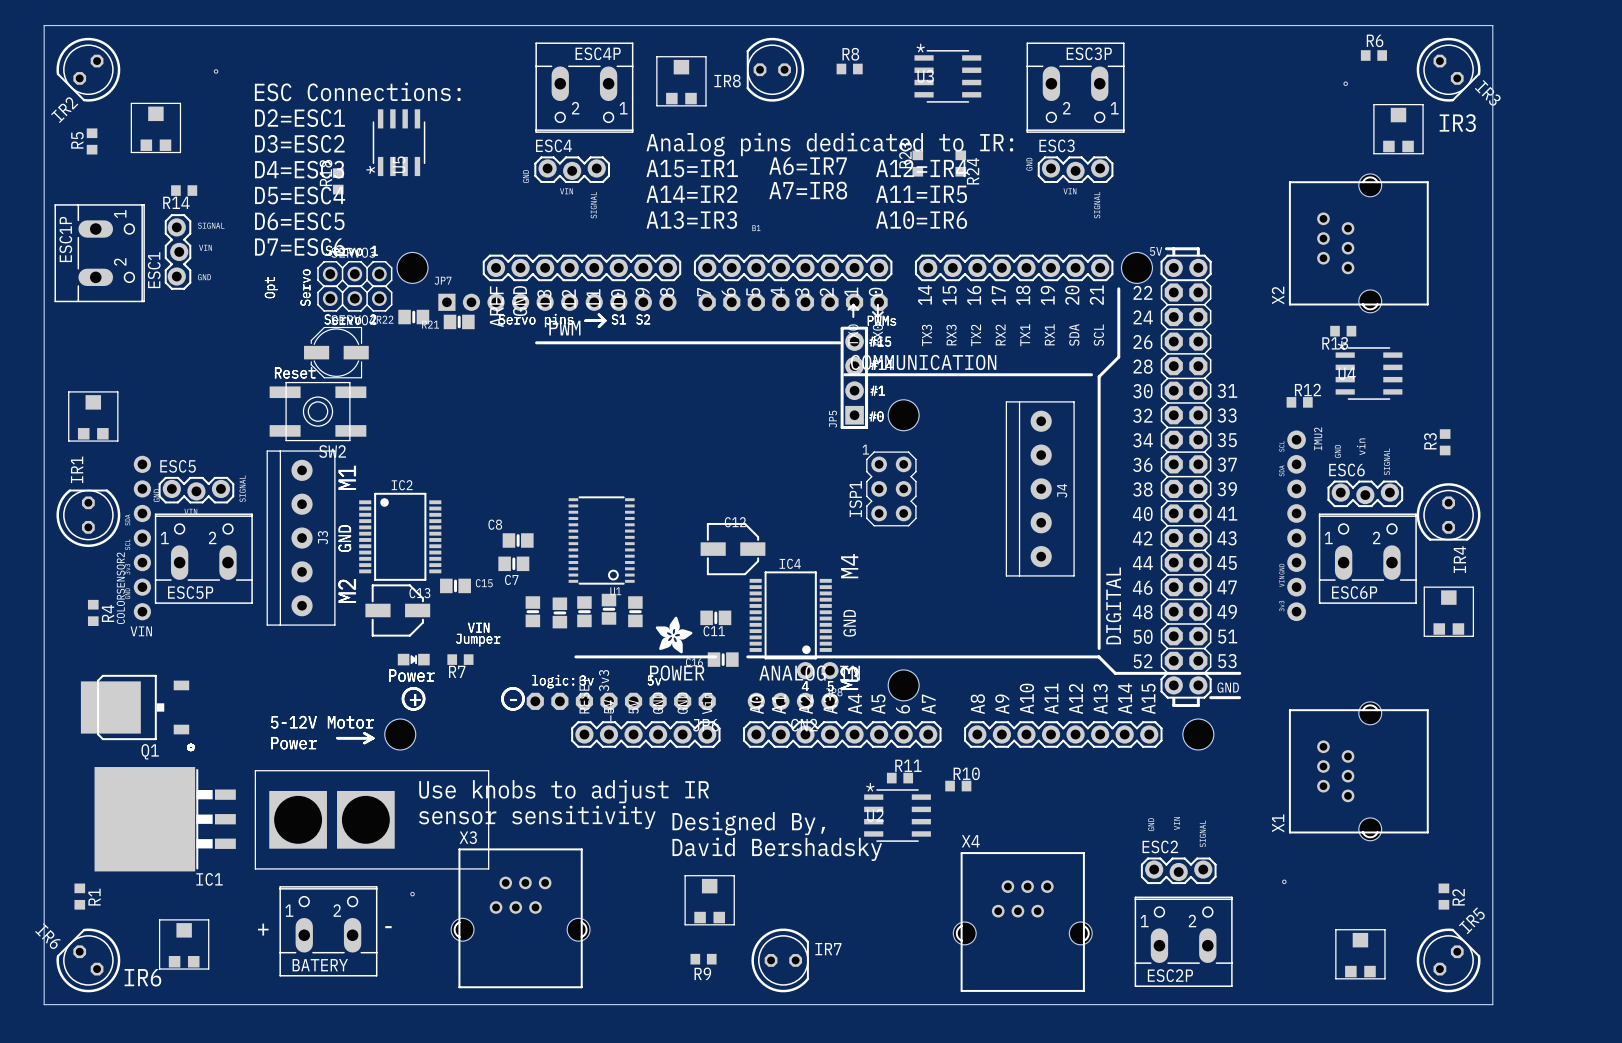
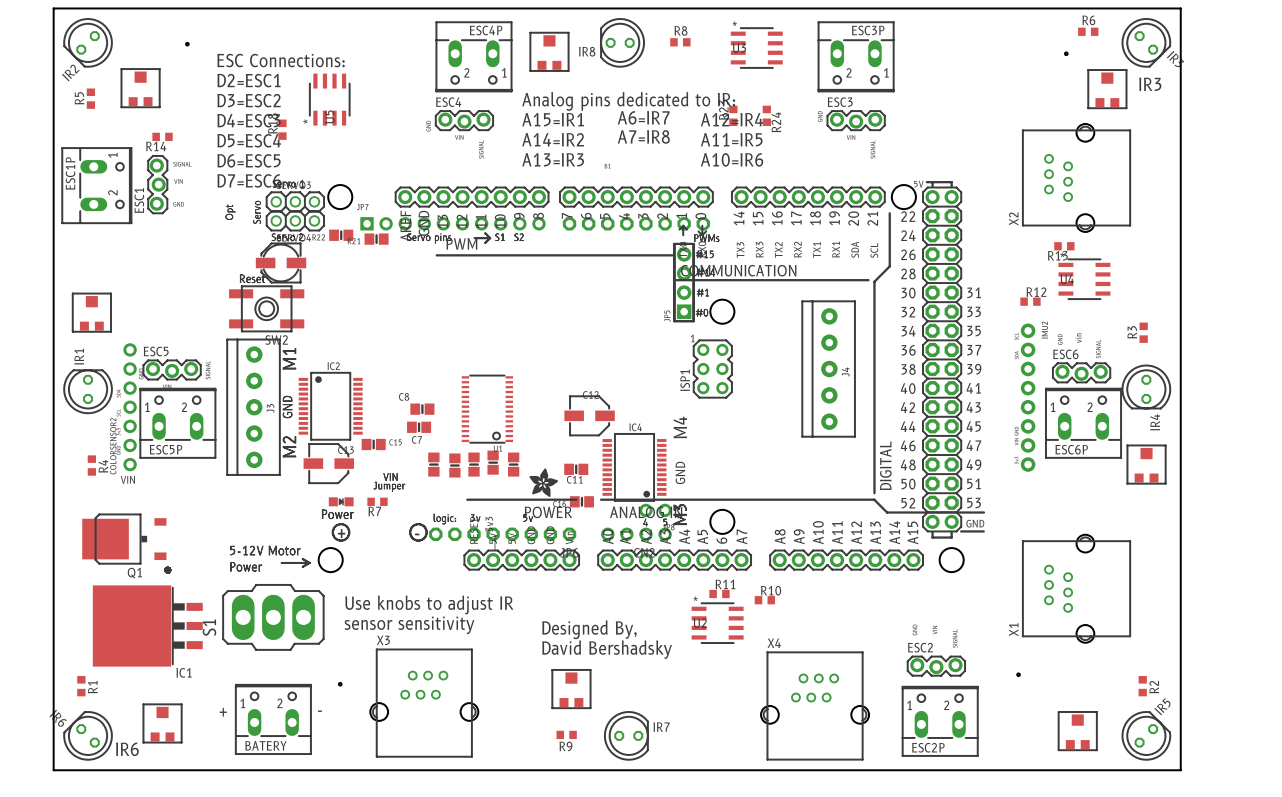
S1: none -> (273, 617)
part: (372, 819) -> none
BATERY footprint: [279, 886, 378, 977] -> [235, 684, 312, 755]

